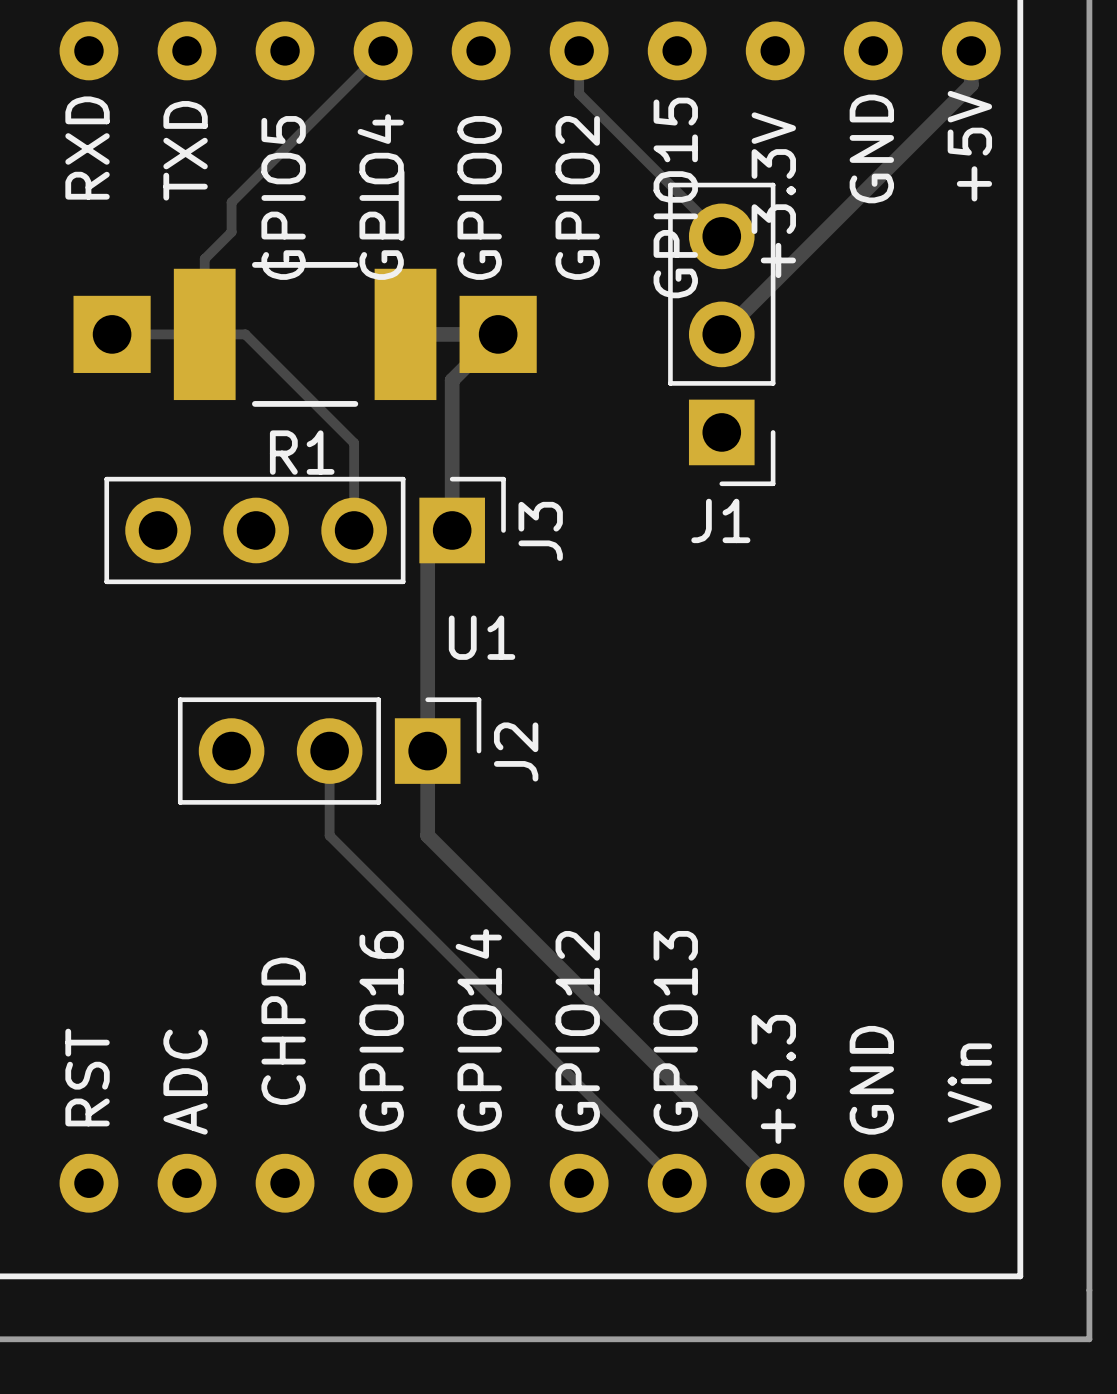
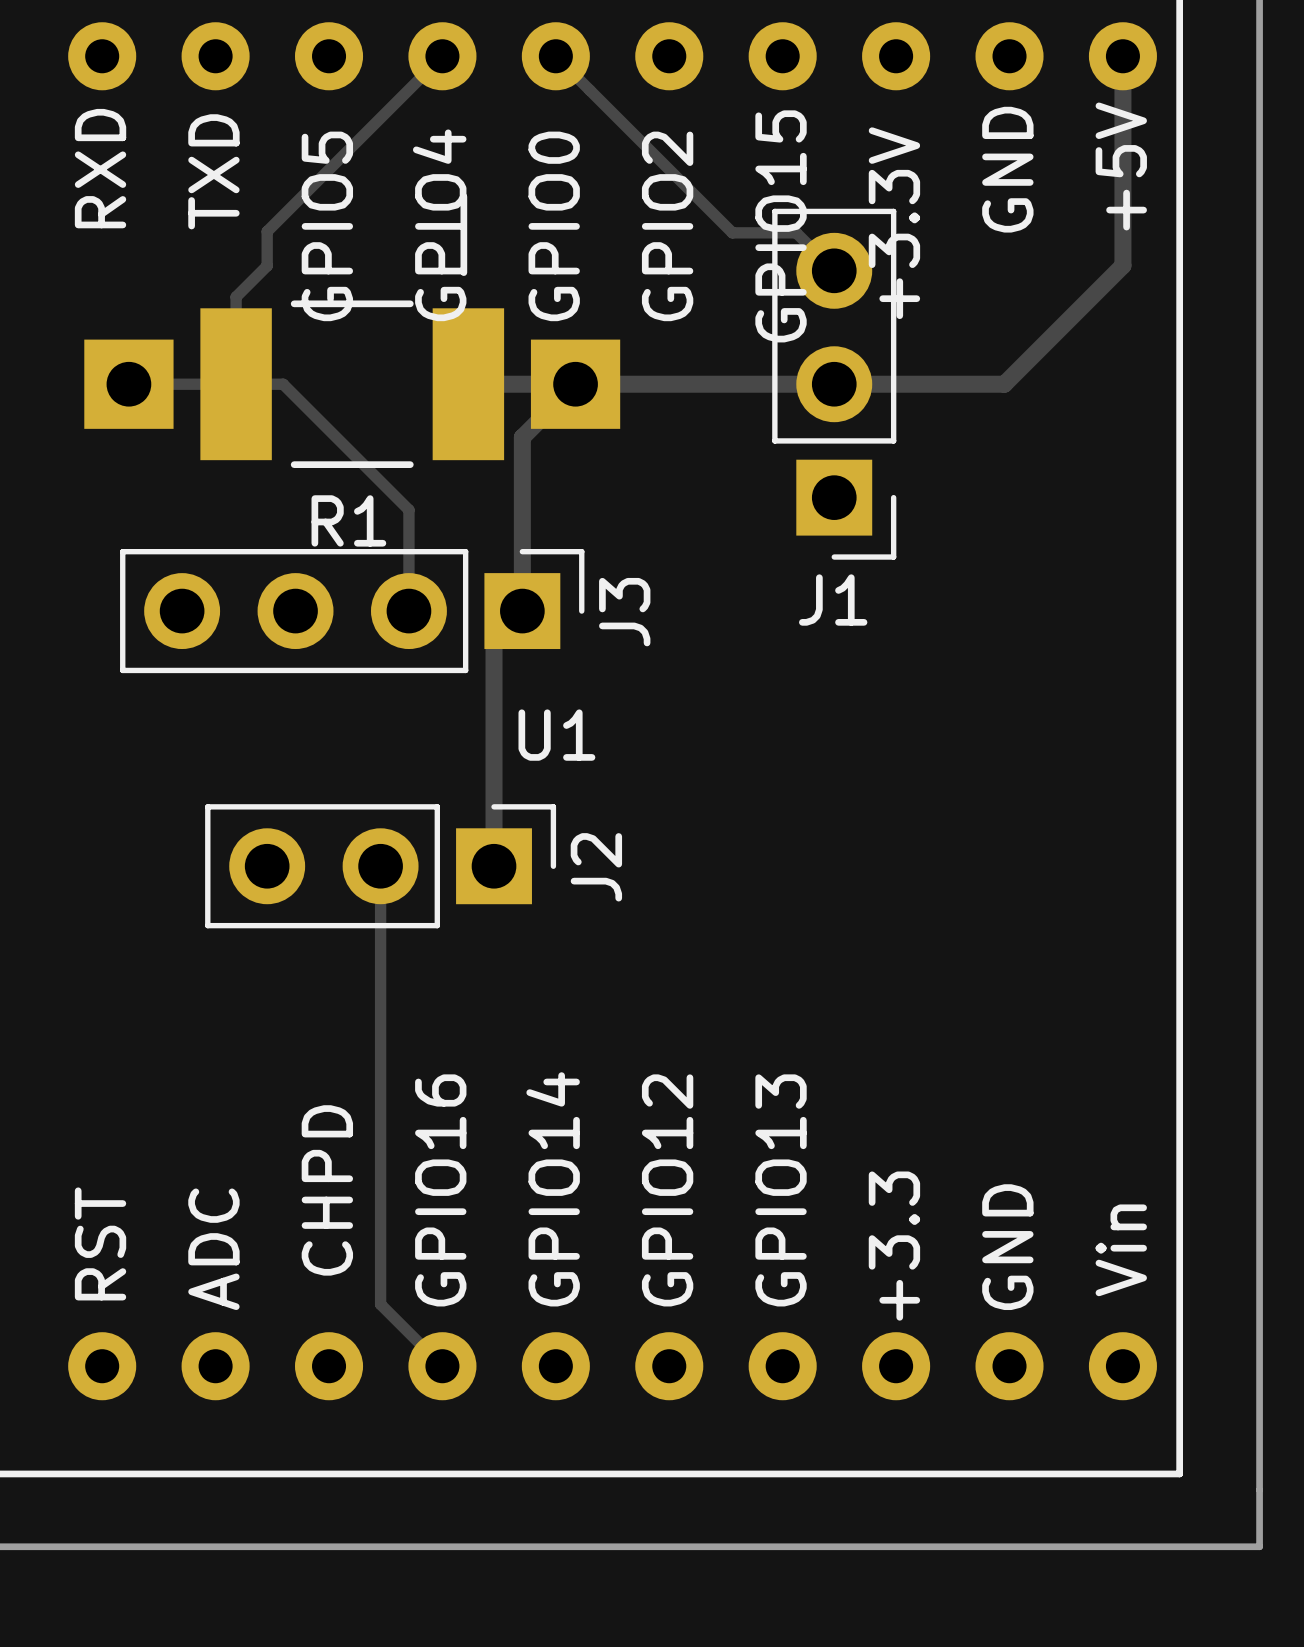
track: (579, 50) (579, 93) (688, 203) -> (555, 56) (732, 232) (796, 232)
track: (971, 84) (721, 334) -> (1122, 95) (1122, 265) (1004, 384) (575, 384)
track: (427, 751) (427, 835) (775, 1183) -> none
track: (329, 835) (677, 1183) -> (380, 964) (380, 1304) (442, 1366)

